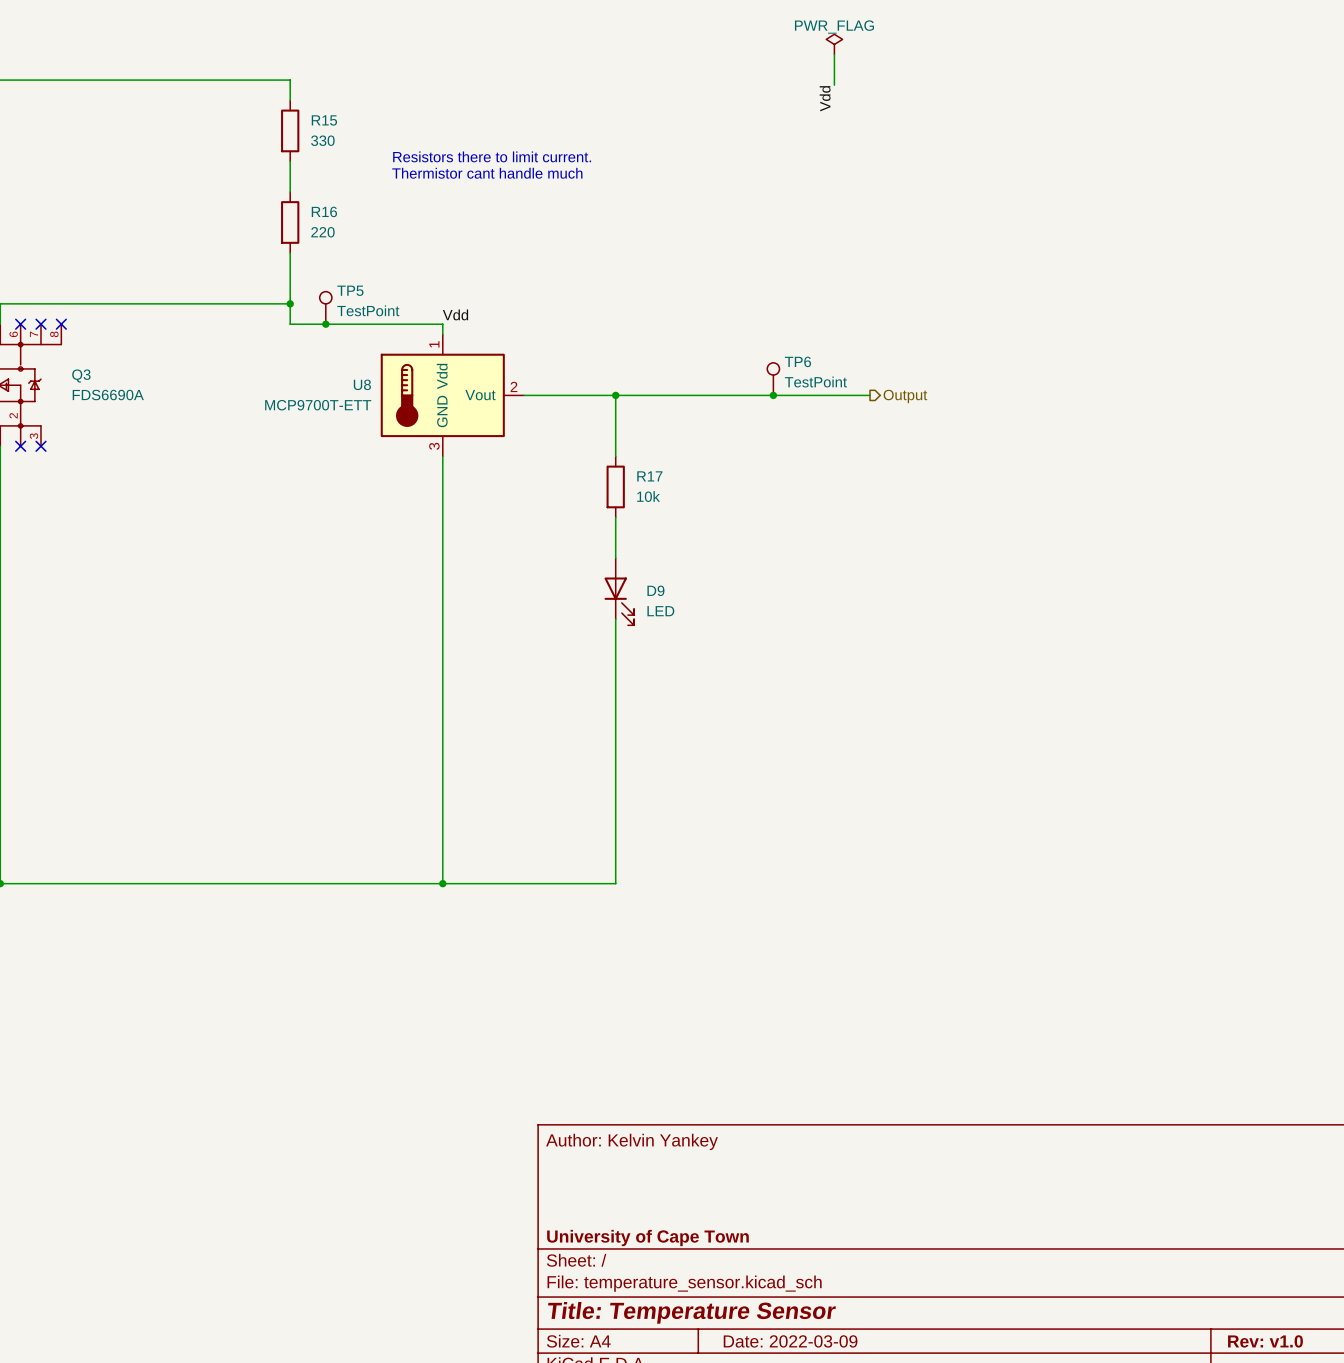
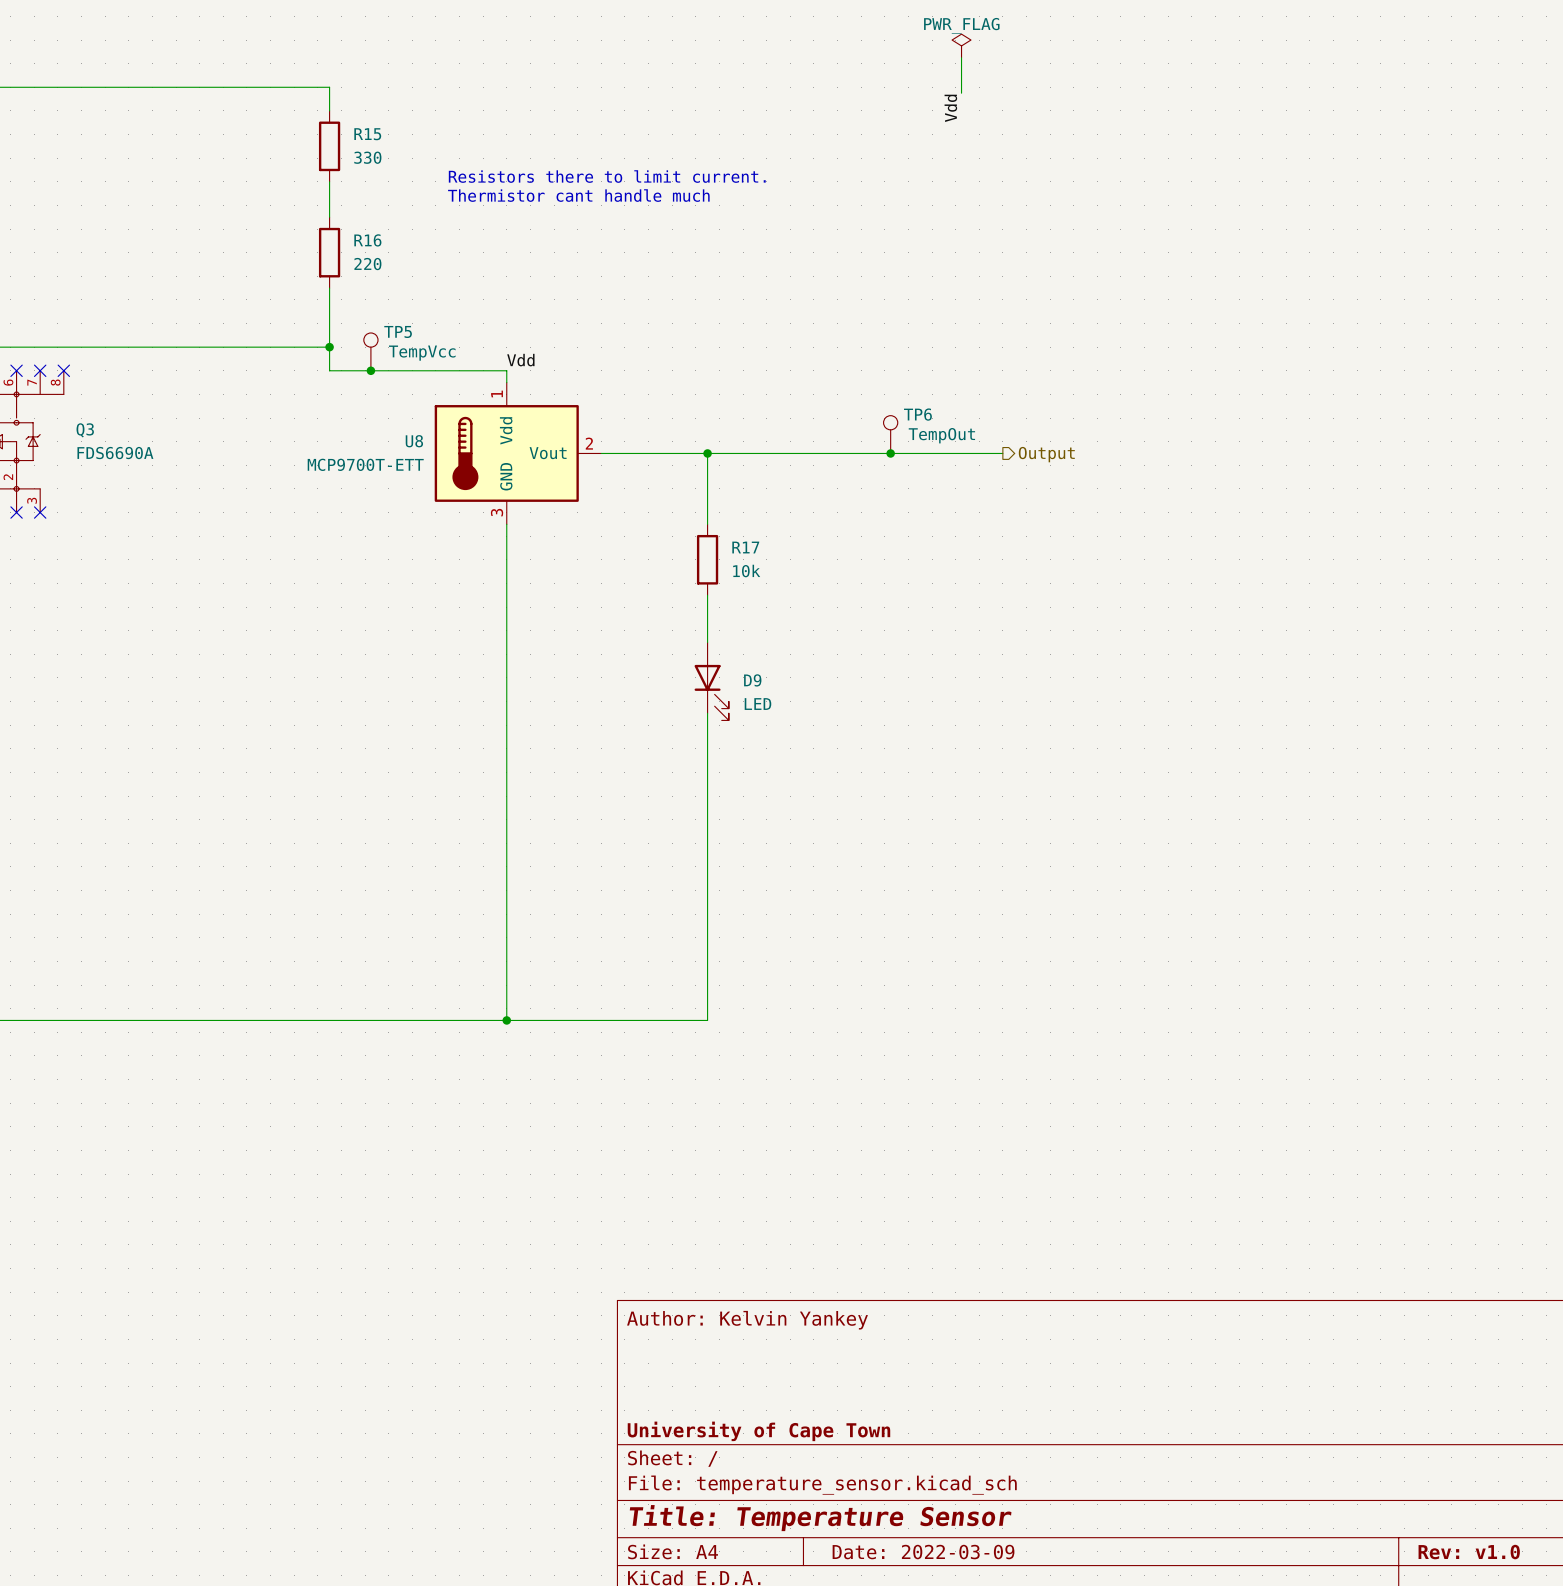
TP5 value: TestPoint (368, 310) -> TempVcc (422, 353)
TP6 value: TestPoint (815, 382) -> TempOut (941, 435)

